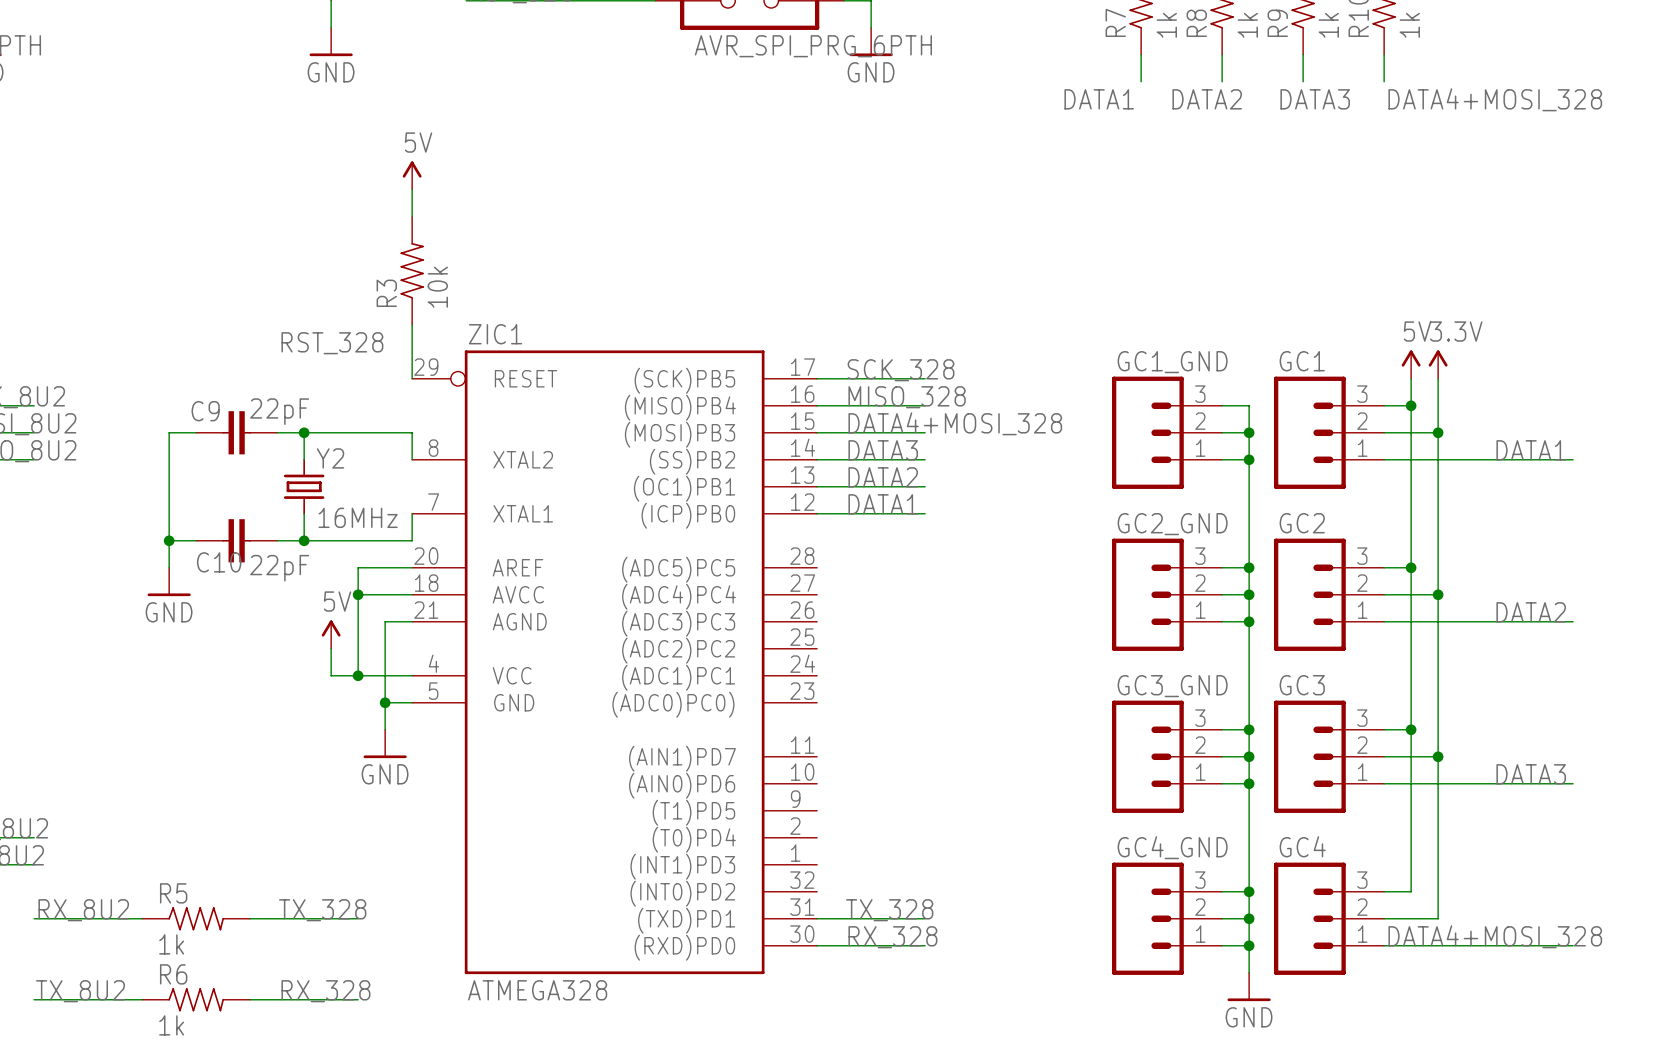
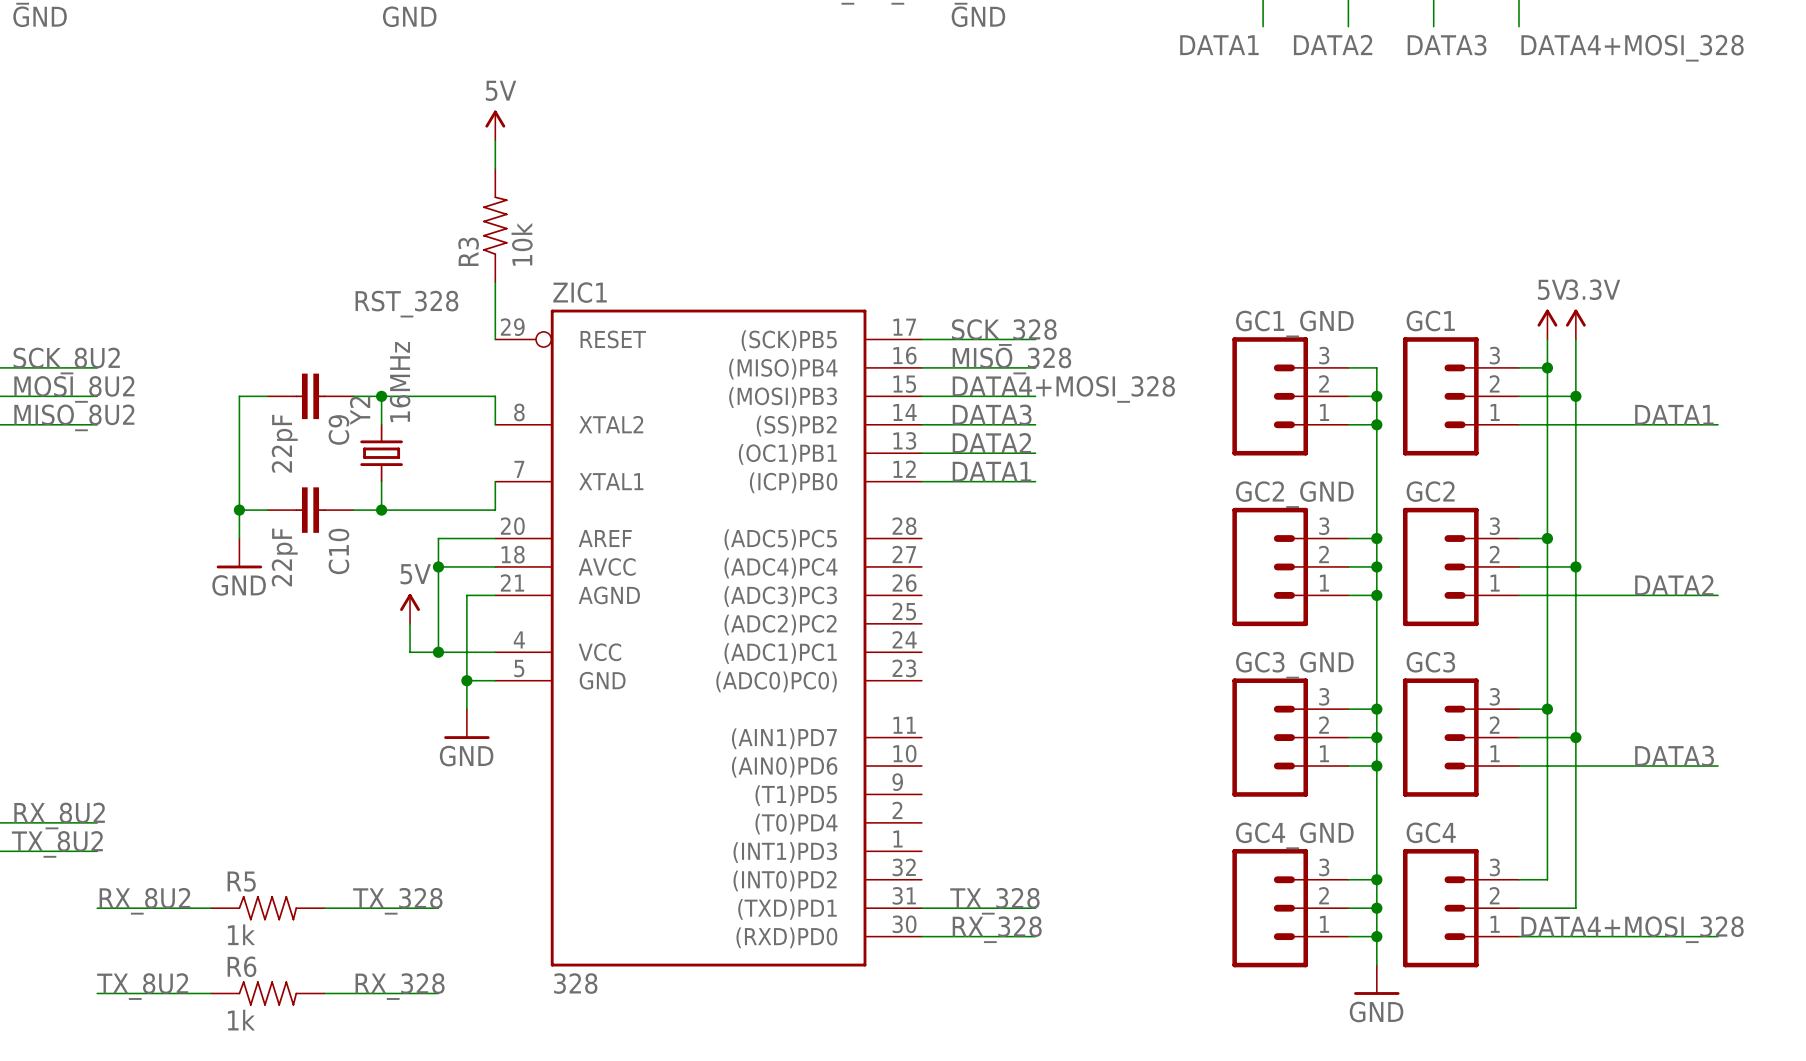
C9 name rotation: 0° (205, 411) -> 90° counterclockwise (338, 429)
C9 name position: C9 (205, 411) -> C9 (338, 429)
C9 value rotation: 0° (279, 411) -> 90° counterclockwise (284, 443)
C9 value position: 22pF (279, 411) -> 22pF (284, 443)
Y2 name rotation: 0° (330, 458) -> 90° counterclockwise (360, 410)
Y2 name position: Y2 (330, 458) -> Y2 (360, 410)
Y2 value rotation: 0° (358, 517) -> 90° counterclockwise (400, 382)
Y2 value position: 16MHz (358, 517) -> 16MHz (400, 382)
C10 name rotation: 0° (219, 562) -> 90° counterclockwise (338, 551)
C10 value rotation: 0° (279, 568) -> 90° counterclockwise (284, 557)
C10 value position: 22pF (279, 568) -> 22pF (284, 557)
ZIC1 value: ATMEGA328 (537, 990) -> 328 (575, 983)

